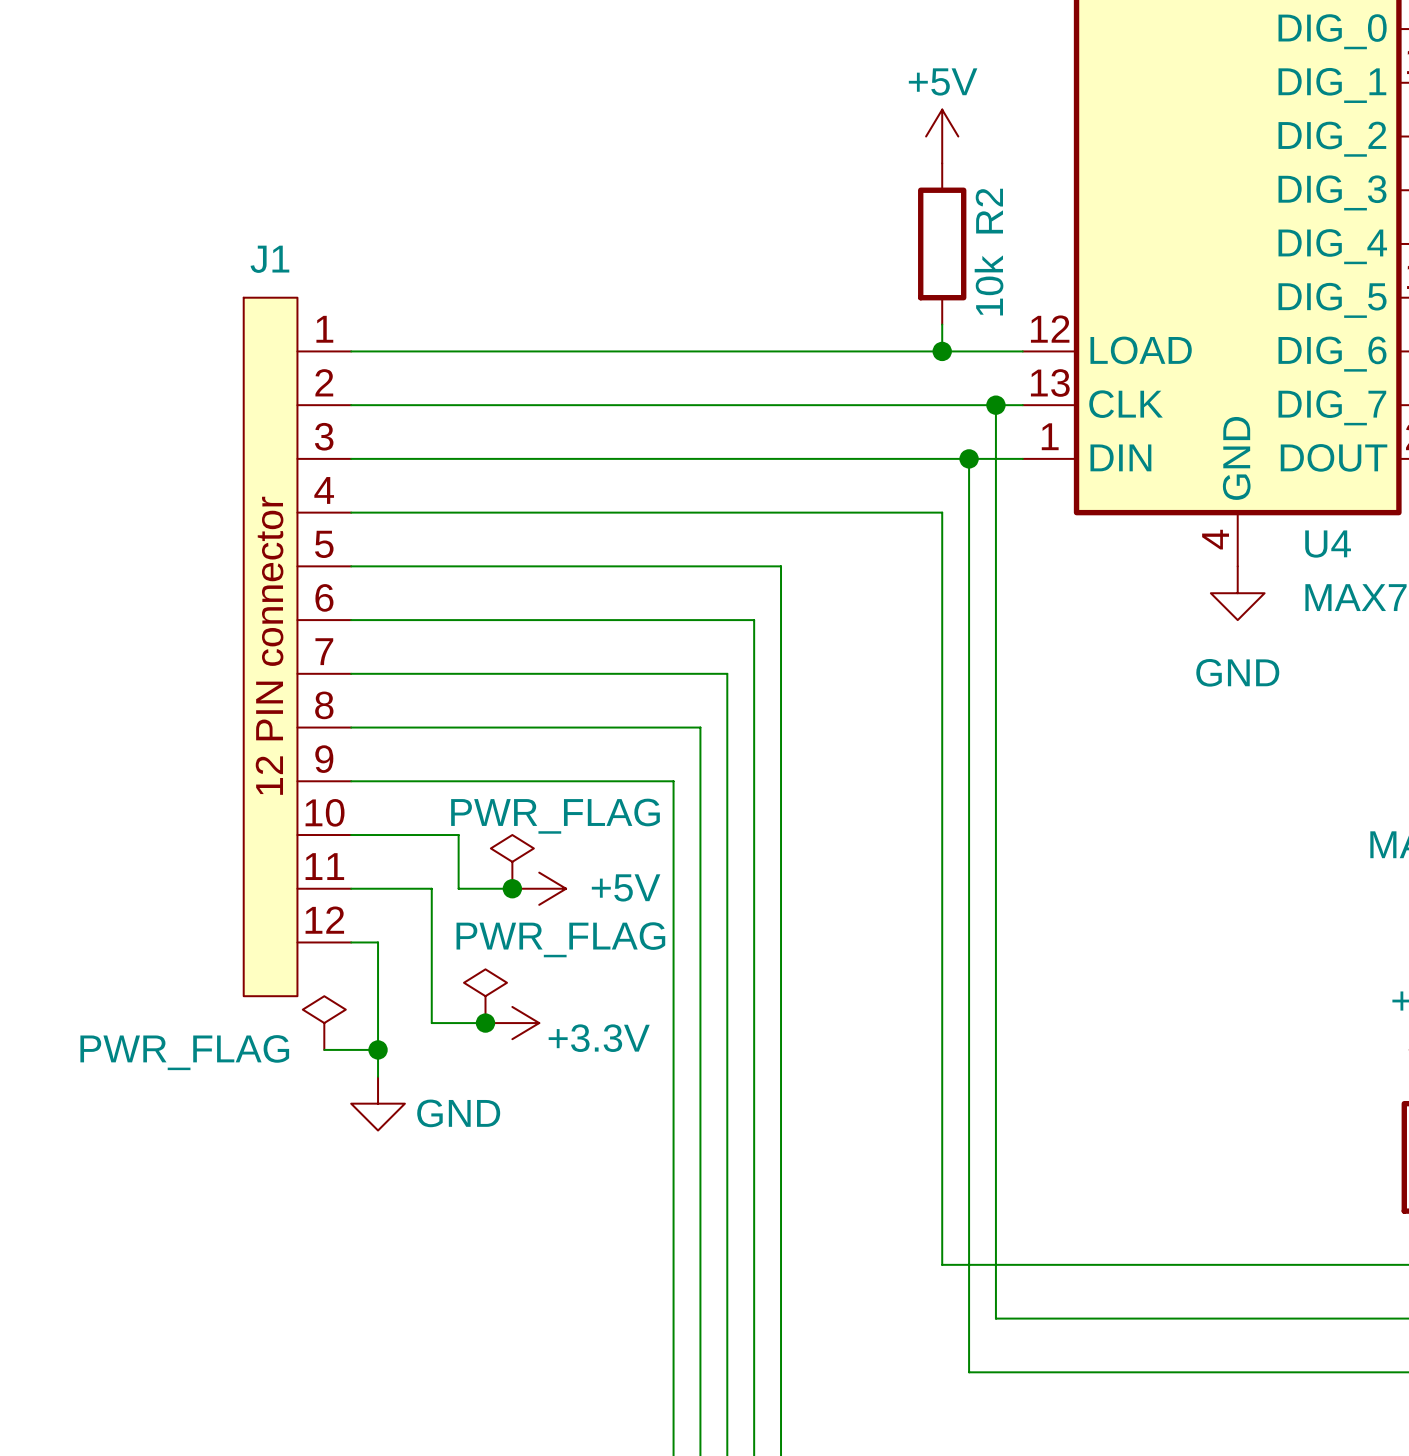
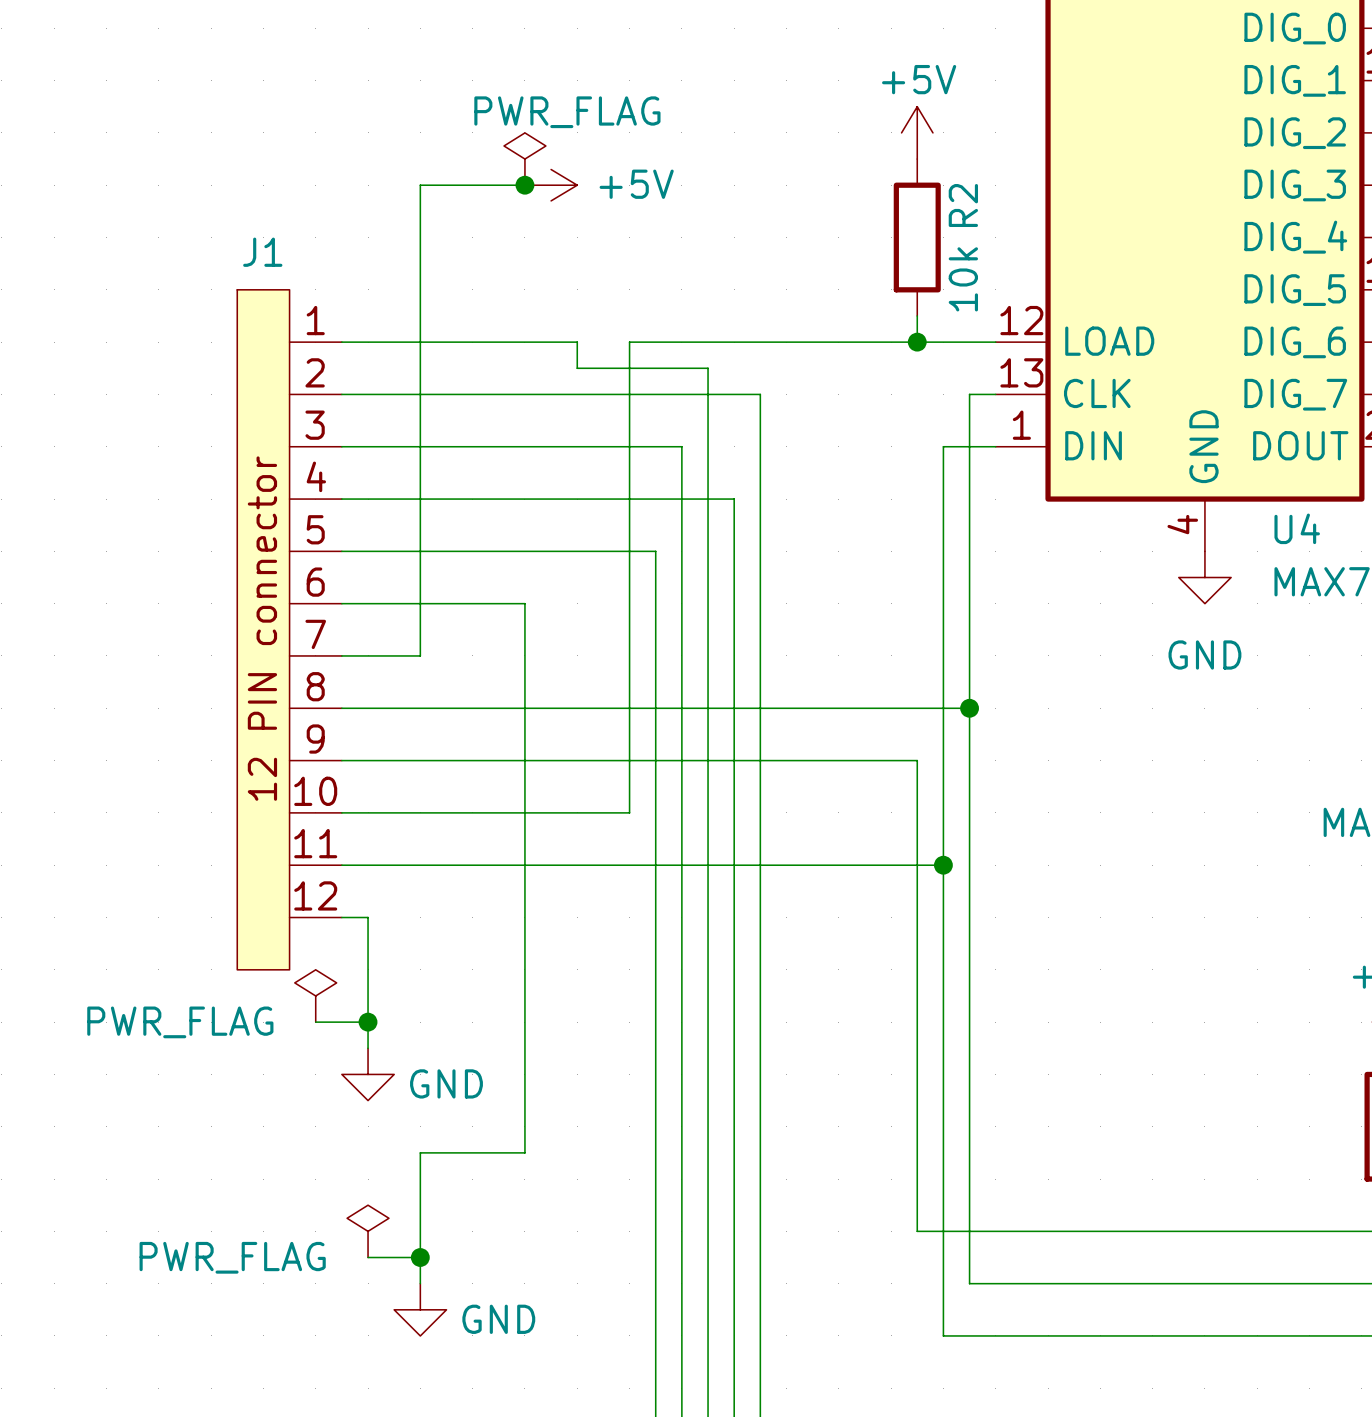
power symbol: none -> PWR_FLAG (524, 159)
junction: none -> (524, 185)
power symbol: none -> +5V (551, 185)
wire: (592, 351) (646, 351) -> (577, 342) (577, 368) (708, 368) (708, 655)
wire: none -> (629, 342) (629, 812) (446, 812)
wire: (781, 405) (995, 405) -> none
junction: (995, 405) -> none
wire: (700, 458) (969, 458) -> (681, 446) (681, 708) (969, 708)
junction: (969, 458) -> none
wire: (754, 512) (942, 512) (942, 781) -> (655, 551) (655, 760) (917, 760)
wire: (673, 566) (781, 566) -> (760, 394) (760, 551)
wire: (539, 620) (754, 620) -> (734, 499) (734, 603)
wire: none -> (524, 603) (524, 1152) (420, 1152) (420, 1283)
wire: (431, 673) (727, 673) -> (420, 655) (420, 185) (524, 185)
junction: none -> (969, 708)
wire: (458, 835) (458, 888) -> (420, 865) (446, 865)
power symbol: PWR_FLAG (512, 861) -> none
wire: (431, 888) (431, 1023) (485, 1023) -> none
wire: none -> (498, 865) (943, 865)
junction: (512, 888) -> none
power symbol: +5V (539, 888) -> none
junction: none -> (943, 865)
power symbol: PWR_FLAG (485, 996) -> none
junction: (485, 1023) -> none
power symbol: +3.3V (512, 1023) -> none
power symbol: none -> PWR_FLAG (368, 1231)
wire: none -> (368, 1257) (420, 1257)
junction: none -> (420, 1257)
power symbol: none -> GND (420, 1309)

